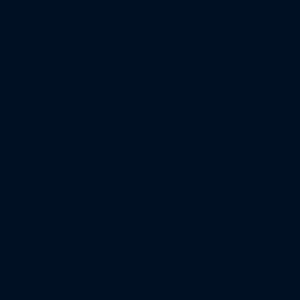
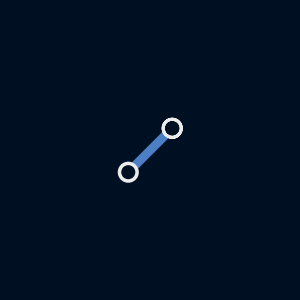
bottom track: none -> (172, 128) (128, 172)
via: none -> (172, 128)
via: none -> (128, 172)

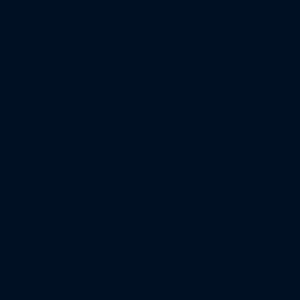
bottom track: (172, 128) (128, 172) -> none
via: (172, 128) -> none
via: (128, 172) -> none

